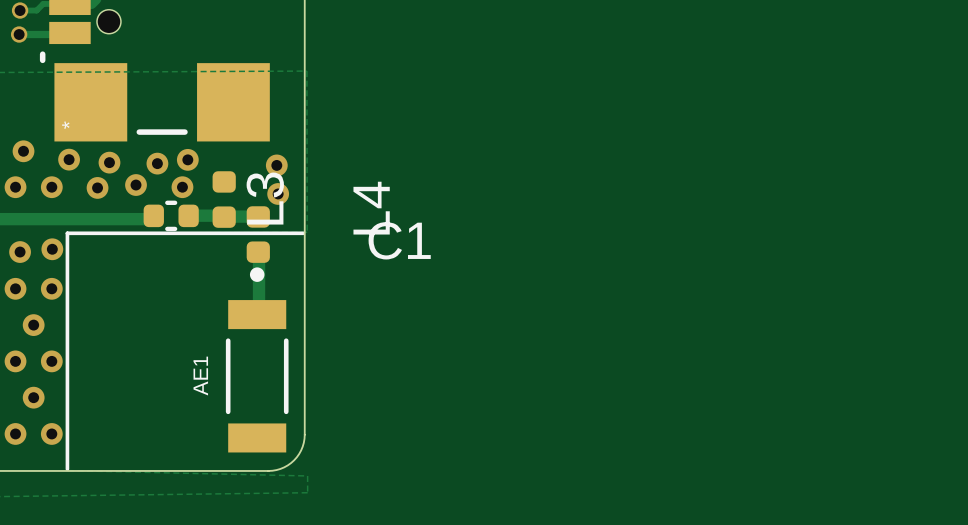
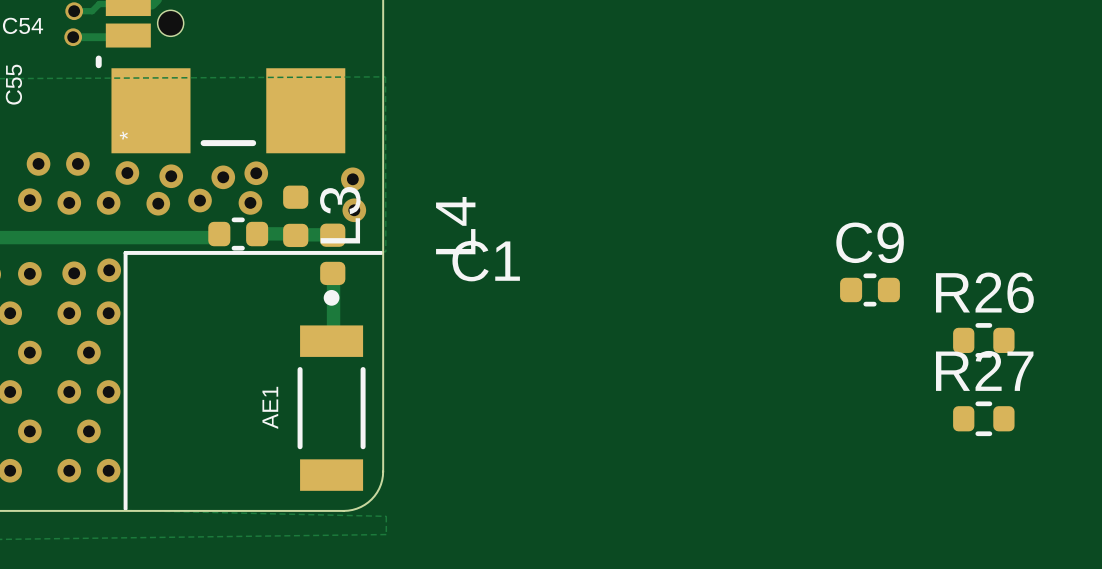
C9: none -> (869, 289)
R26: none -> (983, 340)
R27: none -> (983, 418)

